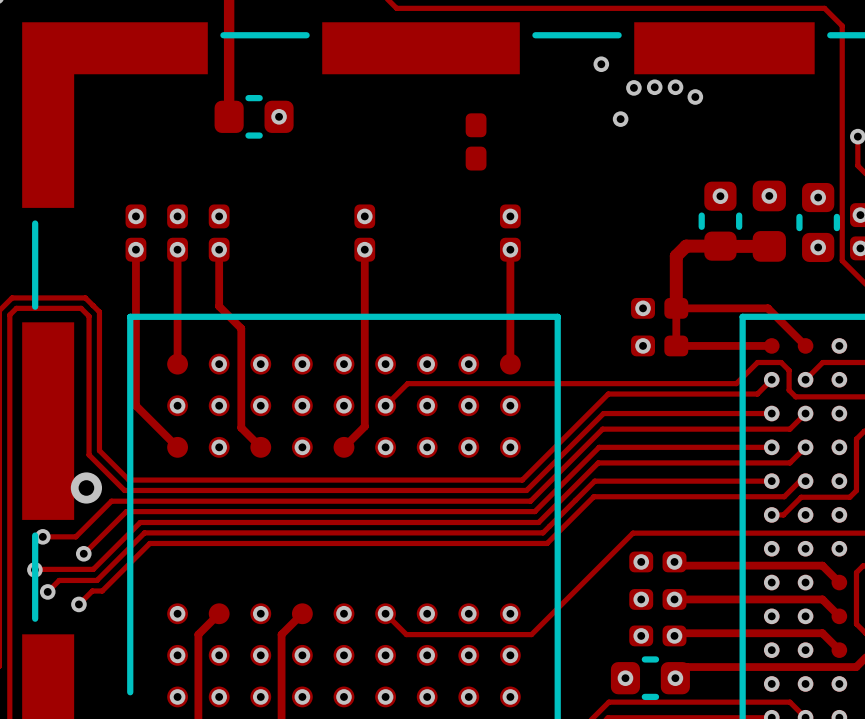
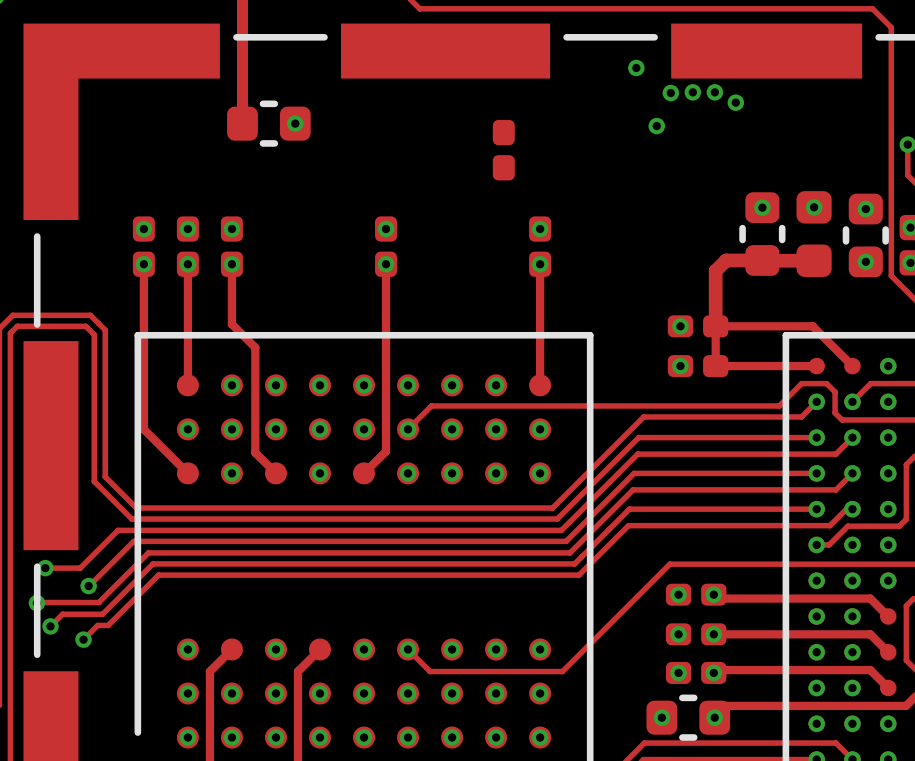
via: (86, 487) -> none

